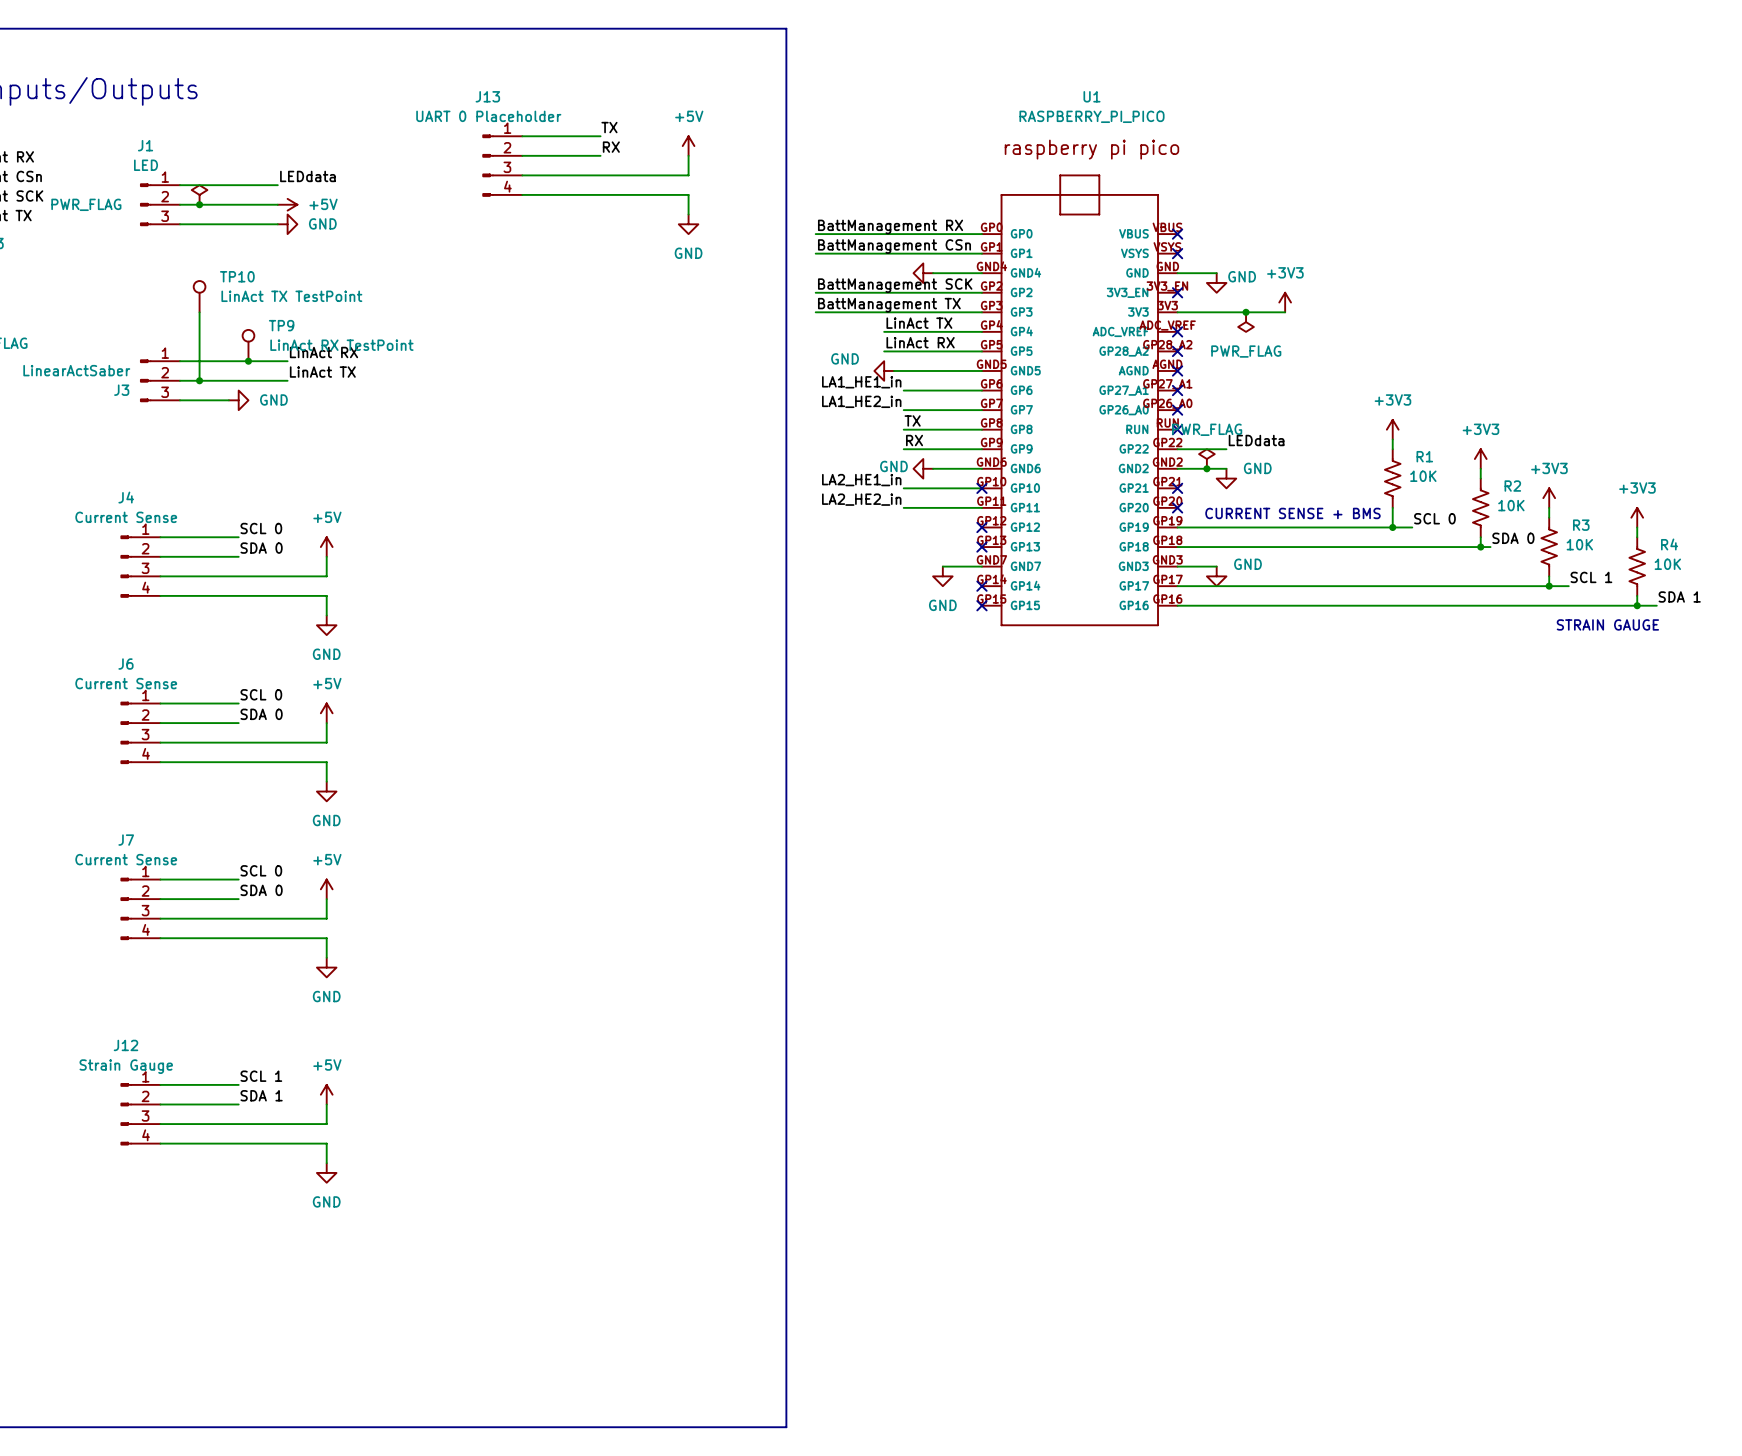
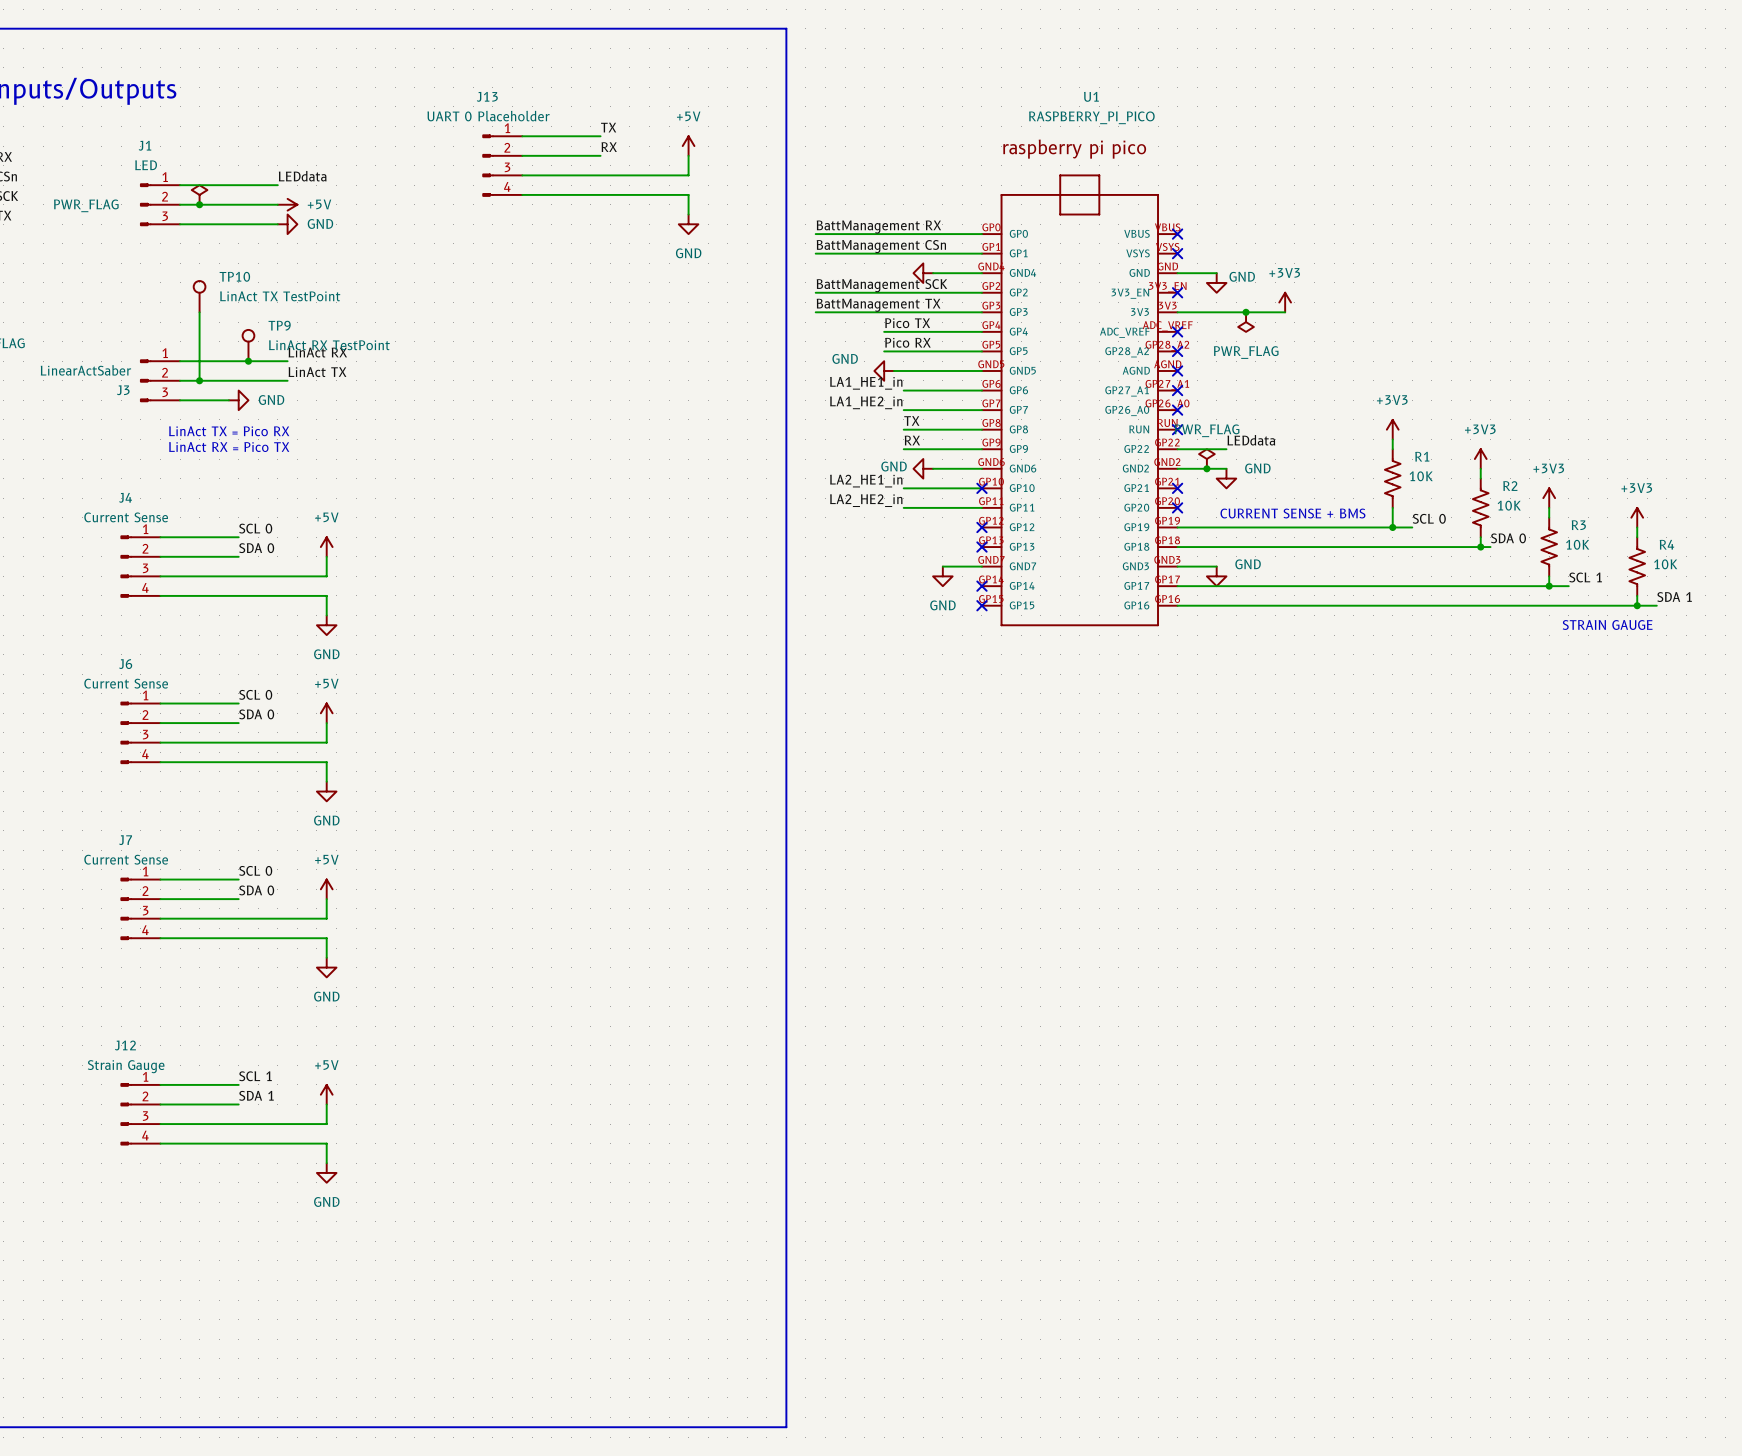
label: LinAct TX (919, 323) -> Pico TX (907, 323)
label: LinAct RX (920, 342) -> Pico RX (907, 342)
text: none -> LinAct TX = Pico RX (229, 431)
text: none -> LinAct RX = Pico TX (229, 447)

